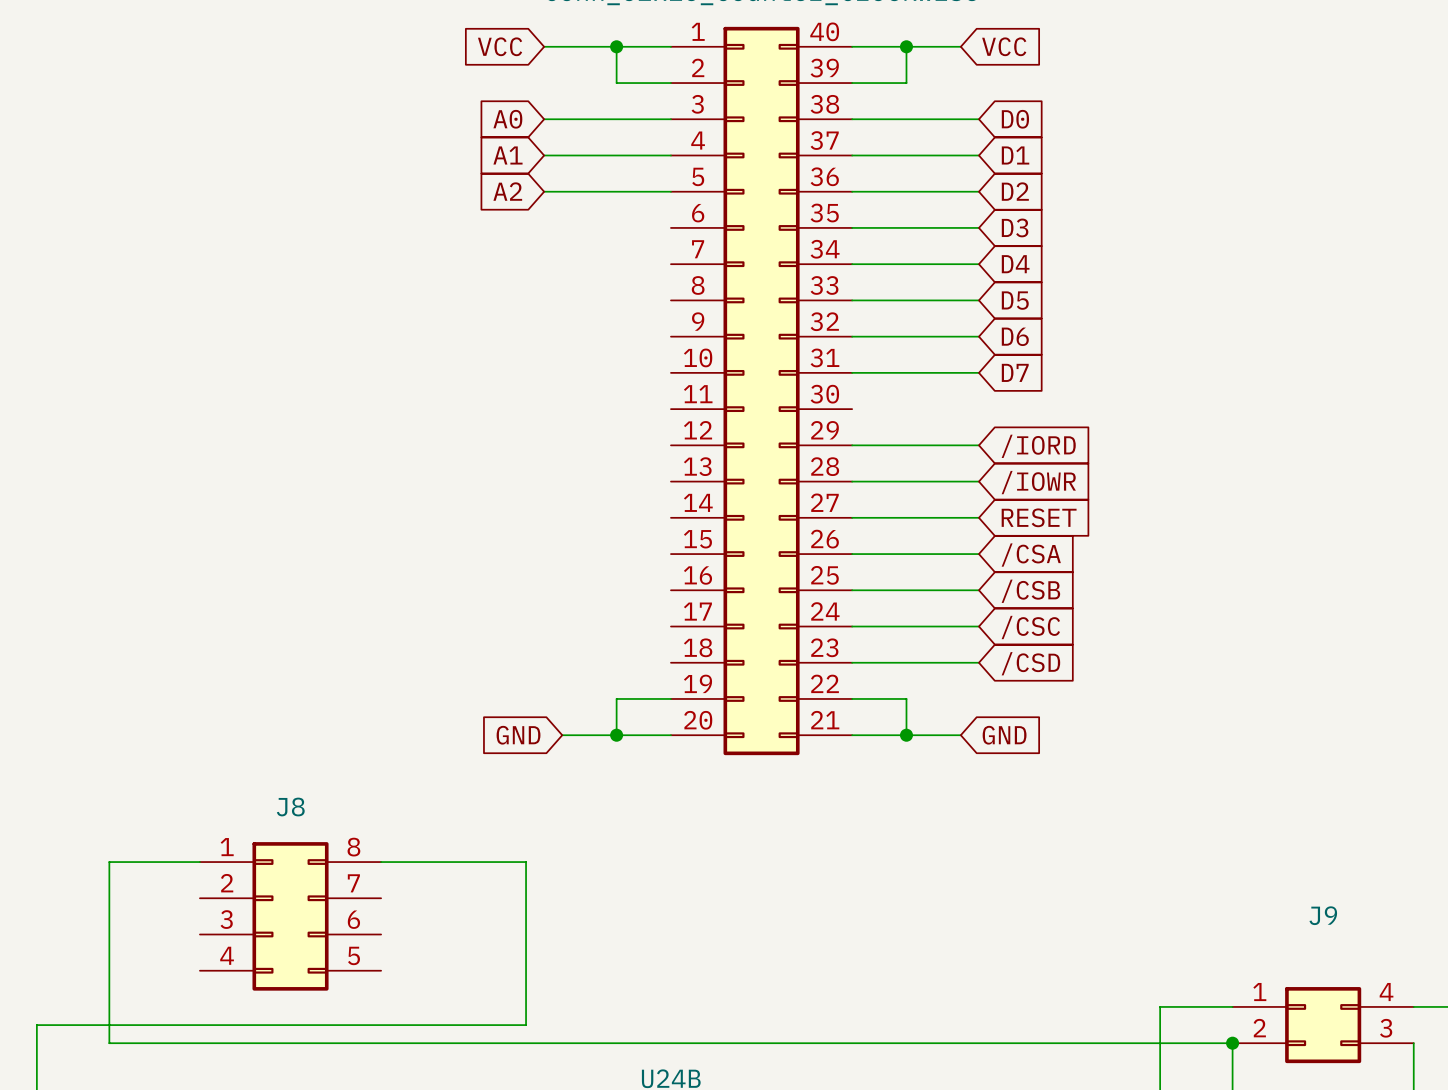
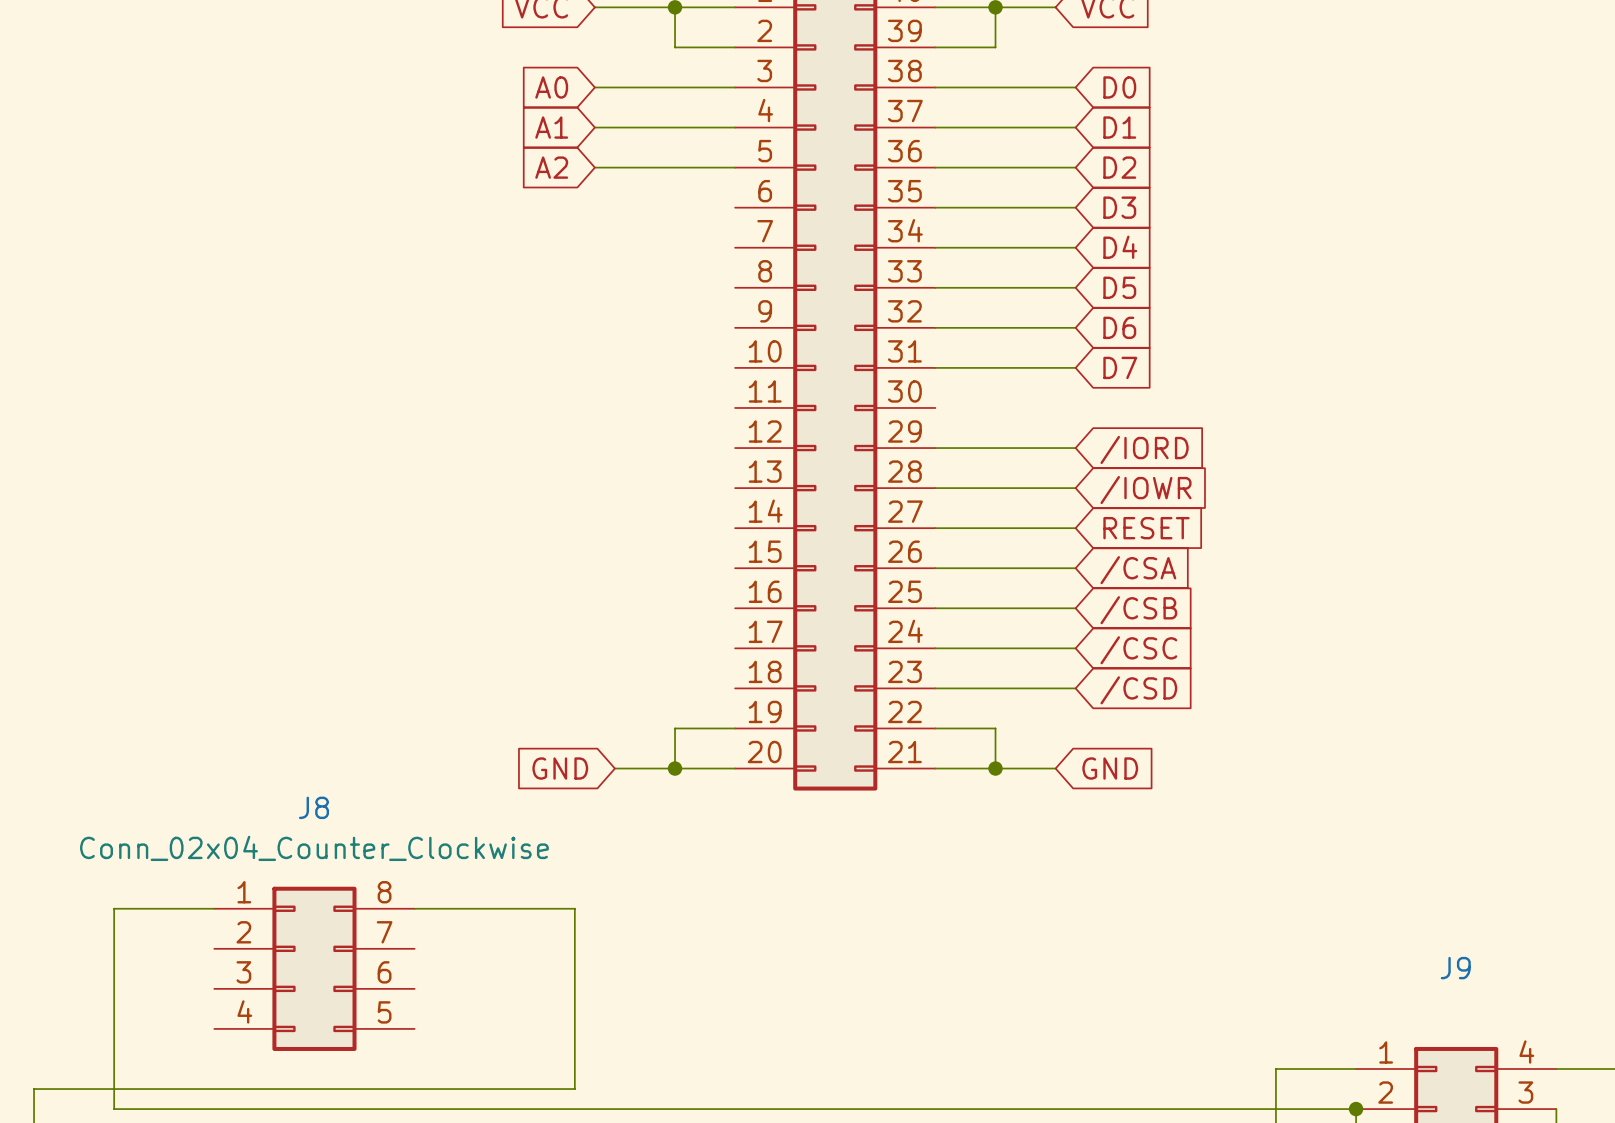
J8 name position: J8 (290, 807) -> J8 (313, 807)
J8 value: none -> Conn_02x04_Counter_Clockwise (314, 848)

